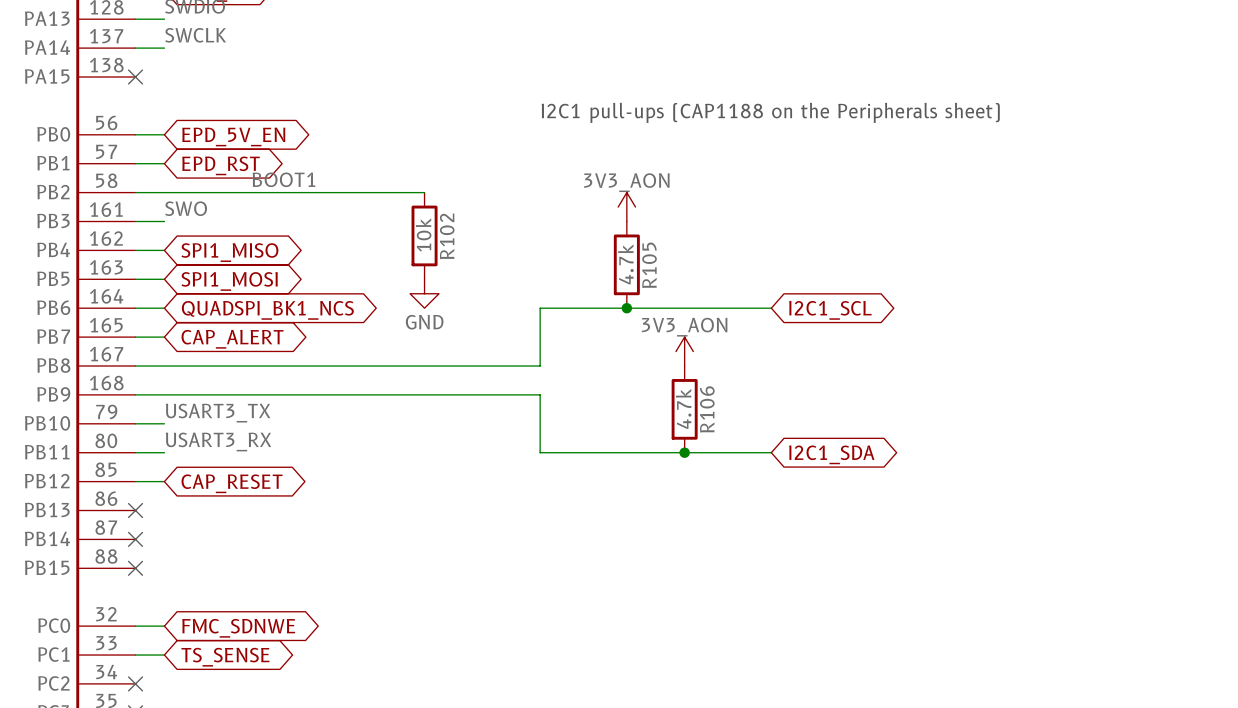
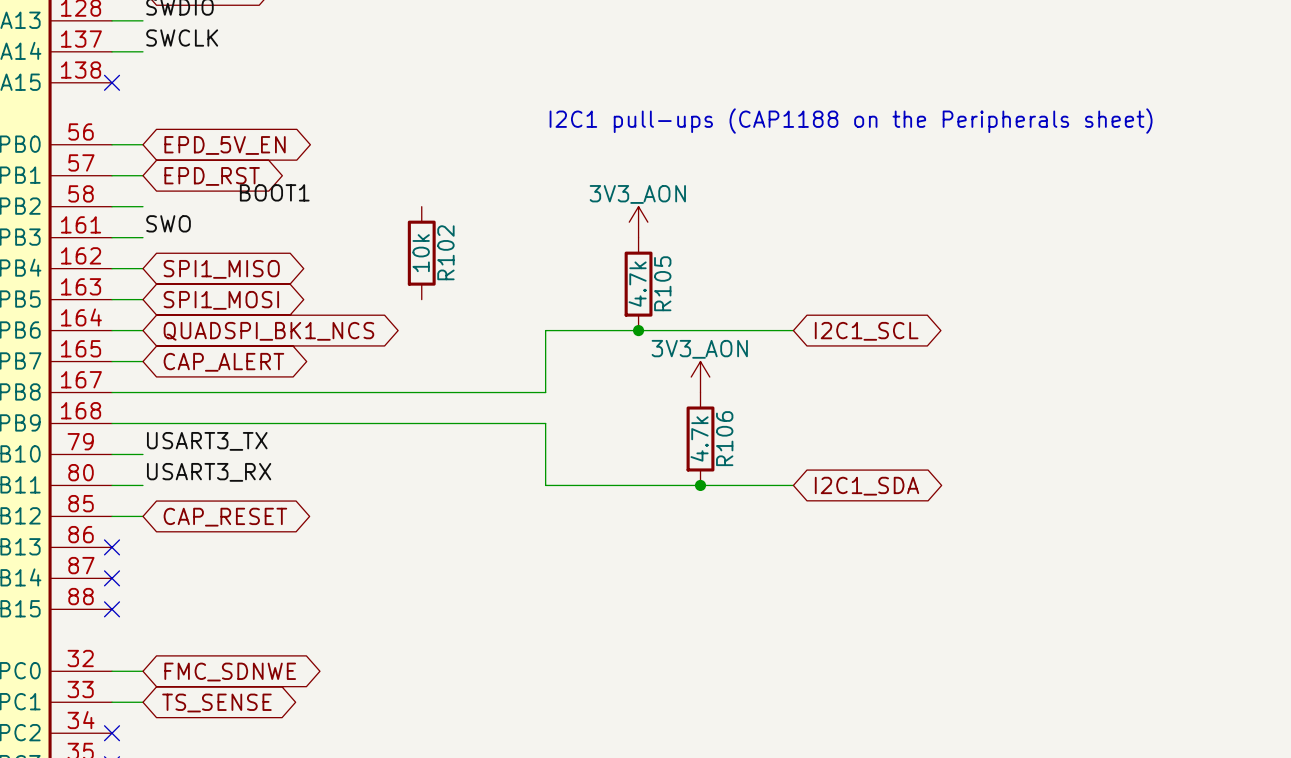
wire: (164, 192) (424, 192) -> none
power symbol: GND (424, 293) -> none

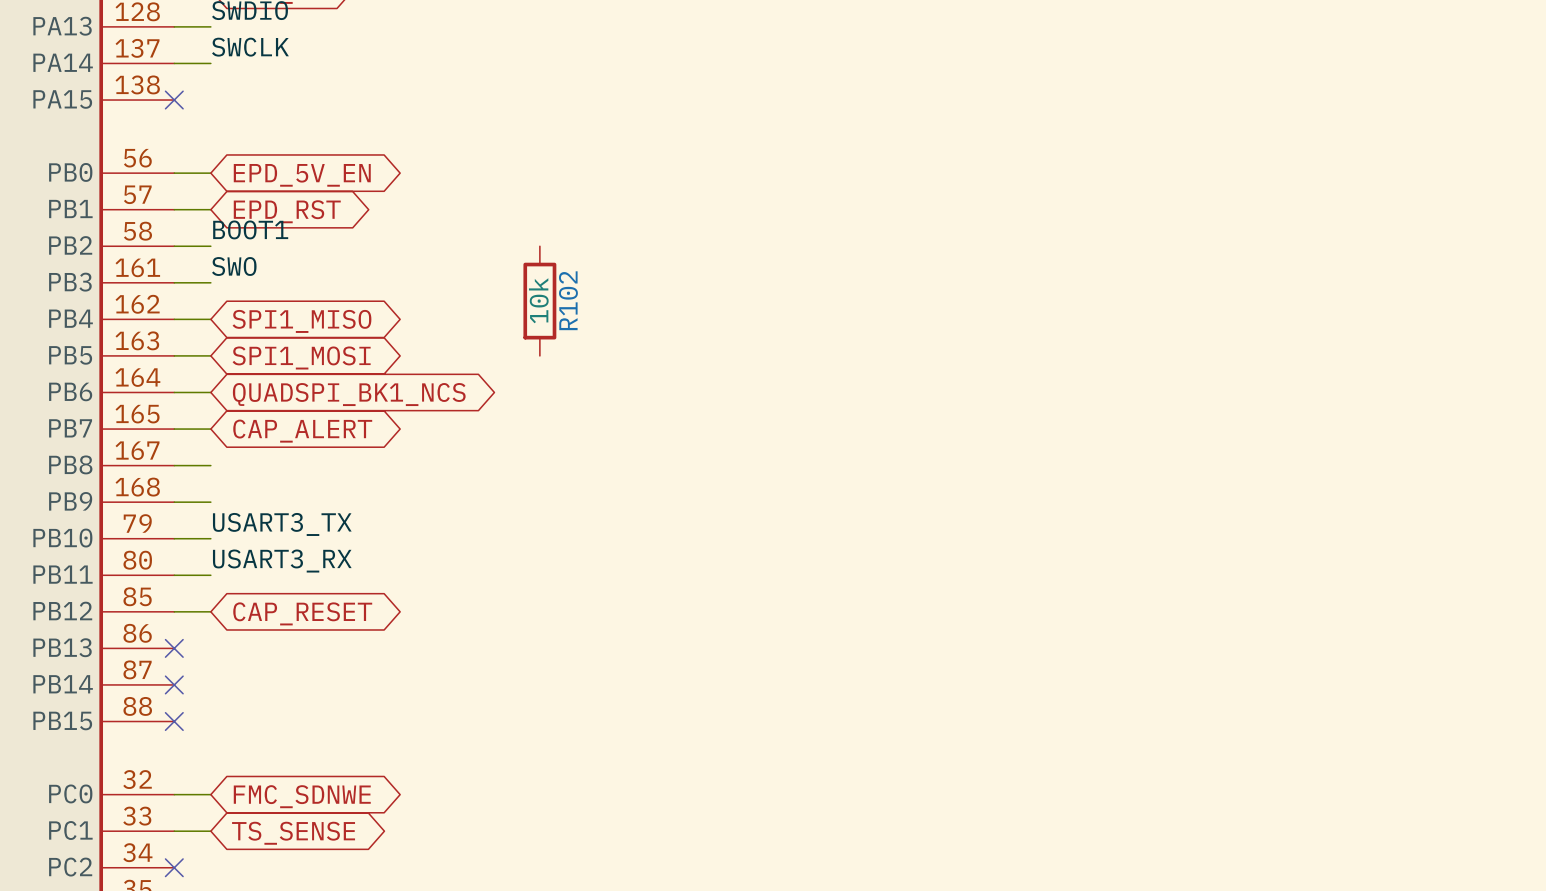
text: I2C1 pull-ups (CAP1188 on the Peripherals sheet) (851, 121) -> none
label position: BOOT1 (274, 192) -> BOOT1 (250, 229)
power symbol: 3V3_AON (638, 222) -> none
R105: 4.7k (638, 284) -> none
junction: (638, 330) -> none
wire: (793, 330) (545, 330) (545, 392) (142, 392) -> none
global label: I2C1_SCL (866, 331) -> none
power symbol: 3V3_AON (700, 377) -> none
wire: (142, 423) (545, 423) (545, 485) (793, 485) -> none
R106: 4.7k (700, 438) -> none
junction: (700, 485) -> none
global label: I2C1_SDA (867, 486) -> none

